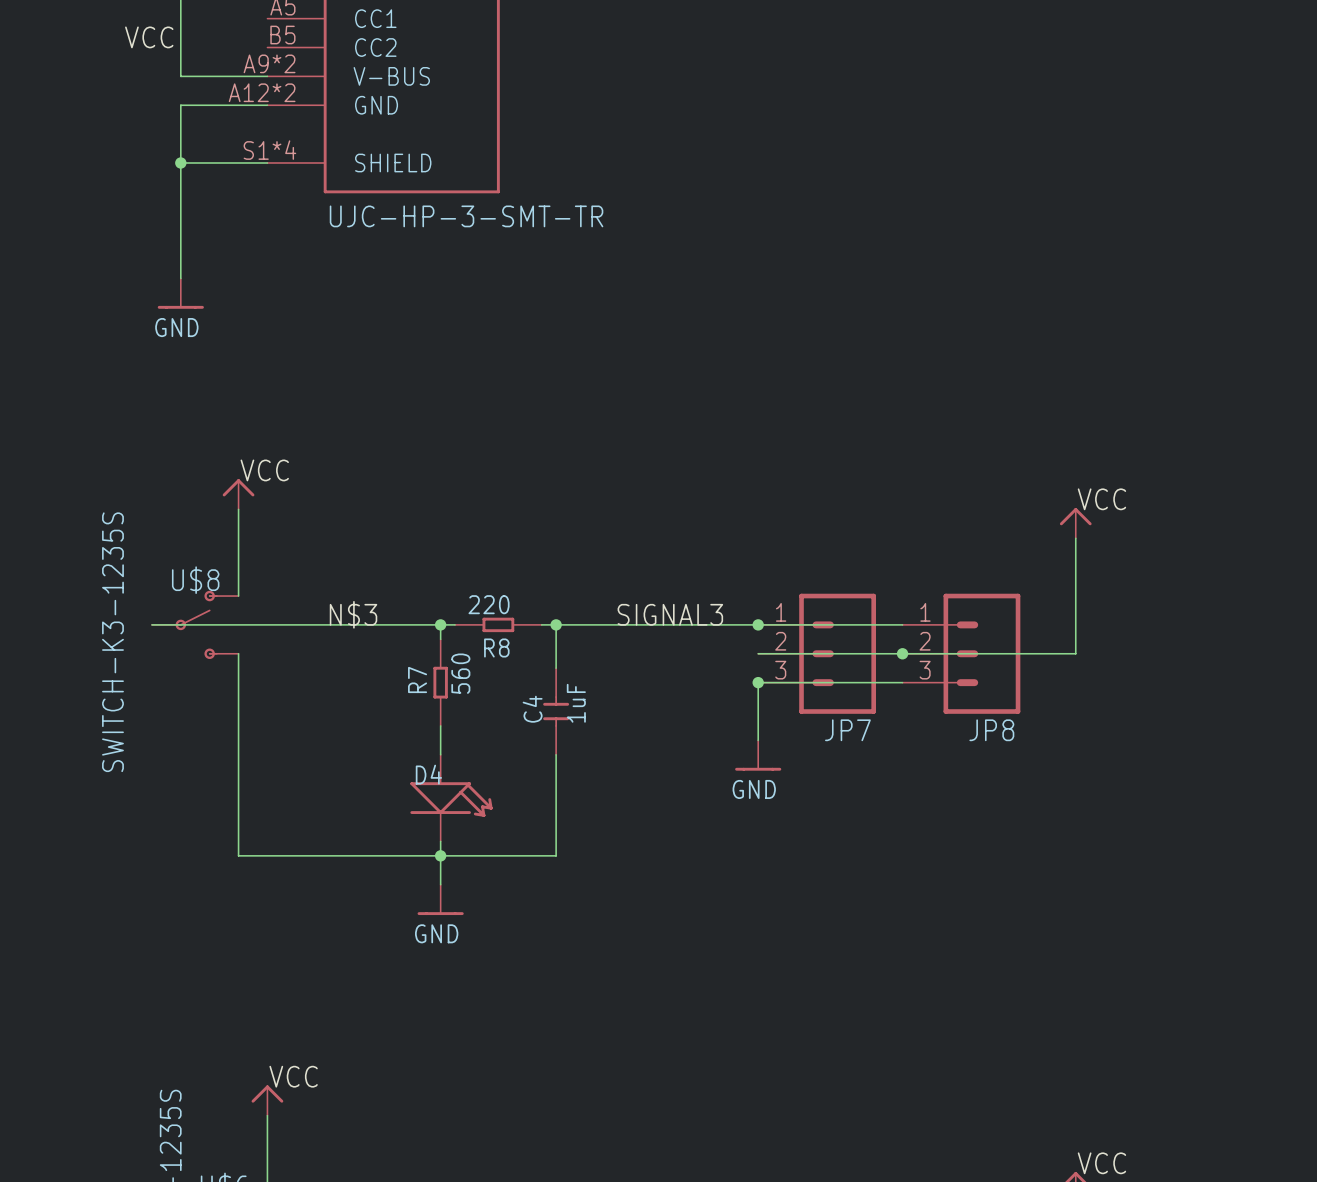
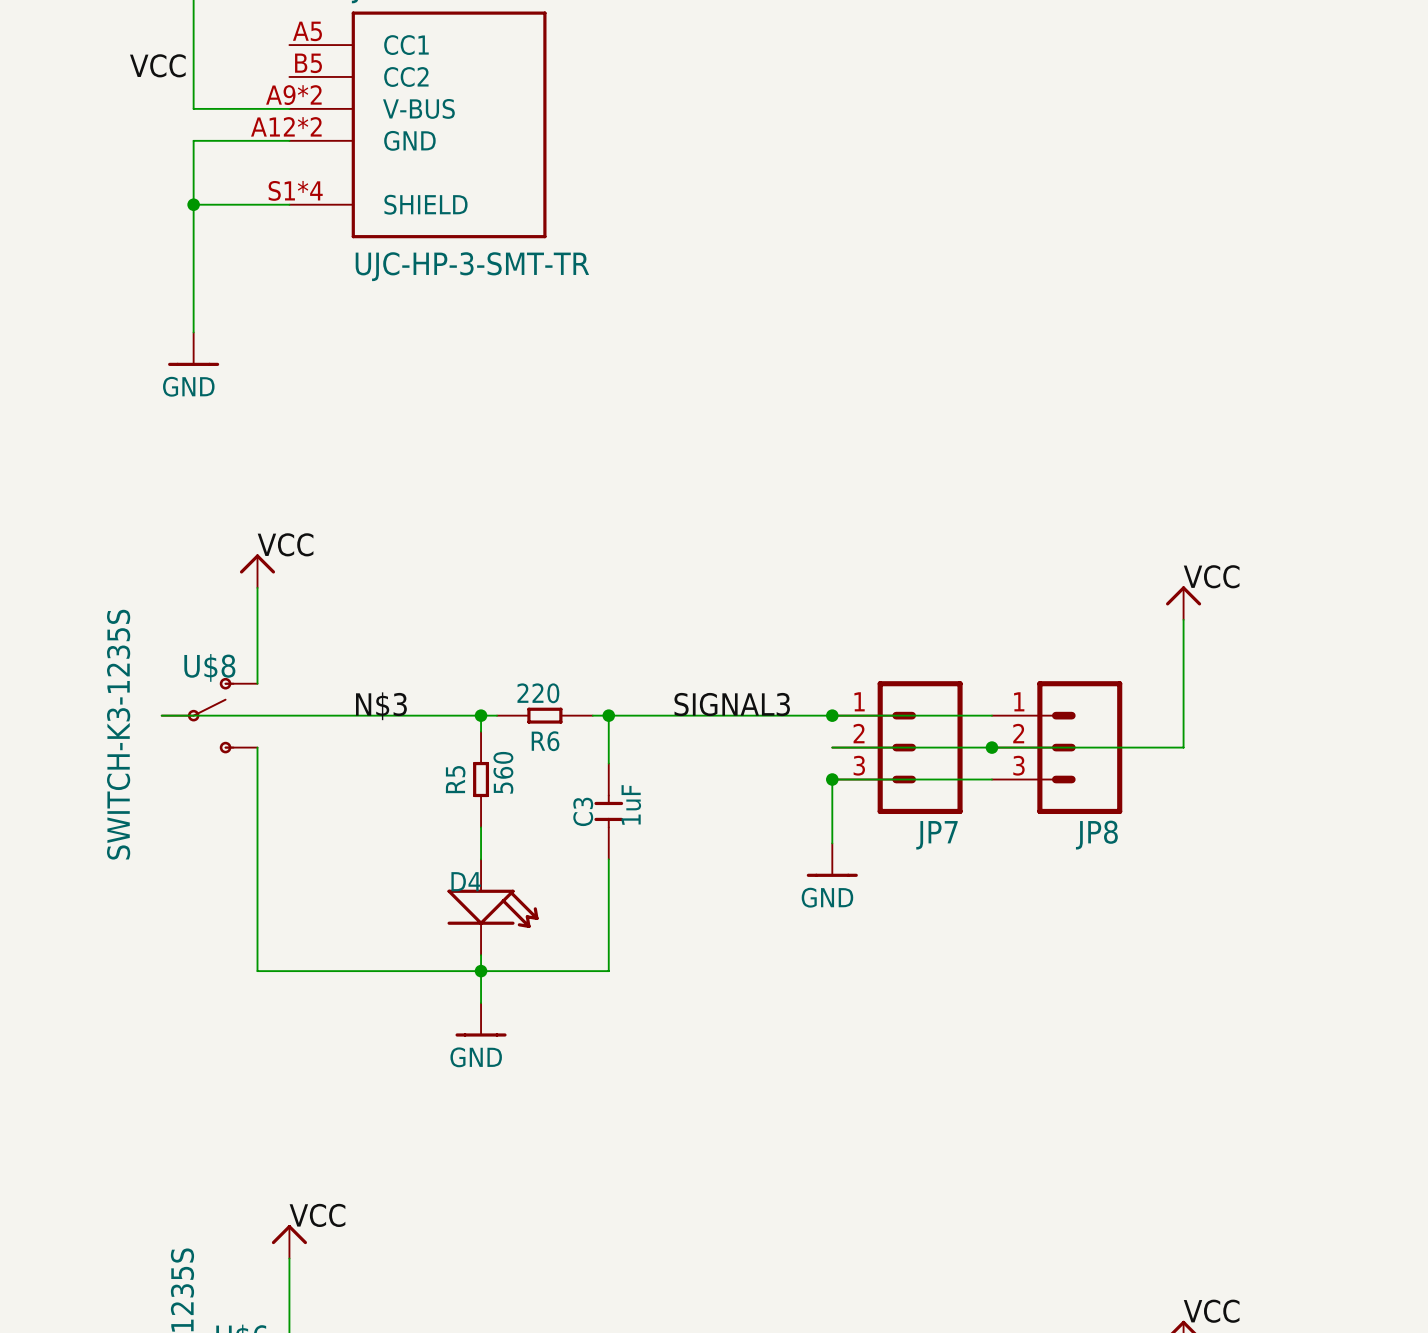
R8 name: R8 (496, 648) -> R6 (545, 741)
R7 name: R7 (417, 679) -> R5 (455, 779)
C4 name: C4 (532, 709) -> C3 (583, 811)

